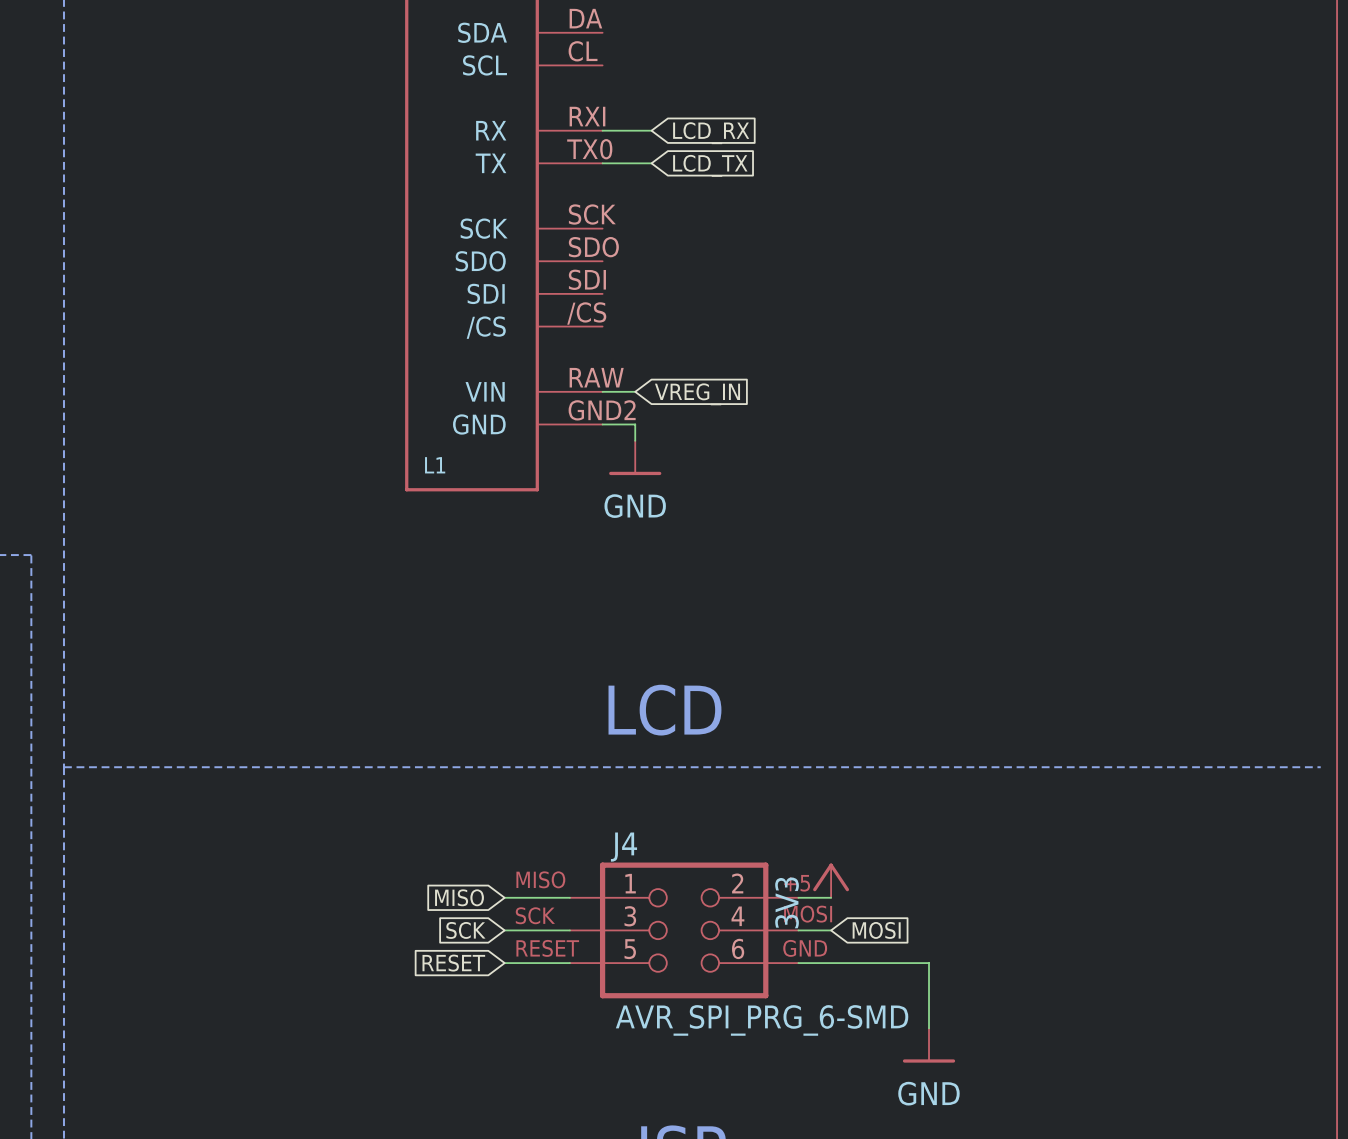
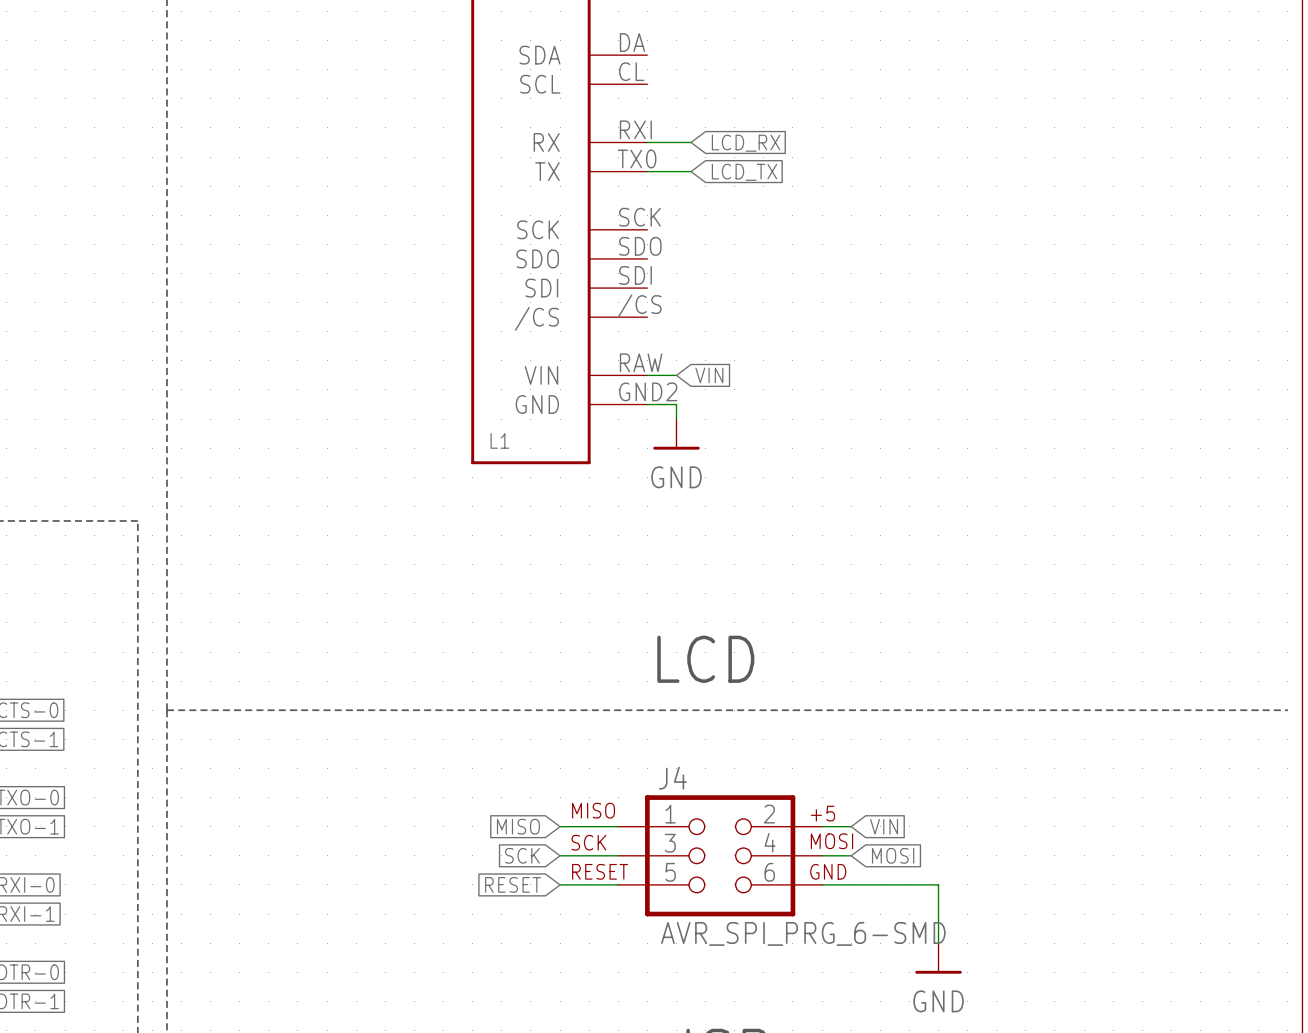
global label: VREG_IN (697, 394) -> VIN (709, 375)
power symbol: 3V3 (831, 880) -> none
global label: none -> VIN (884, 826)

